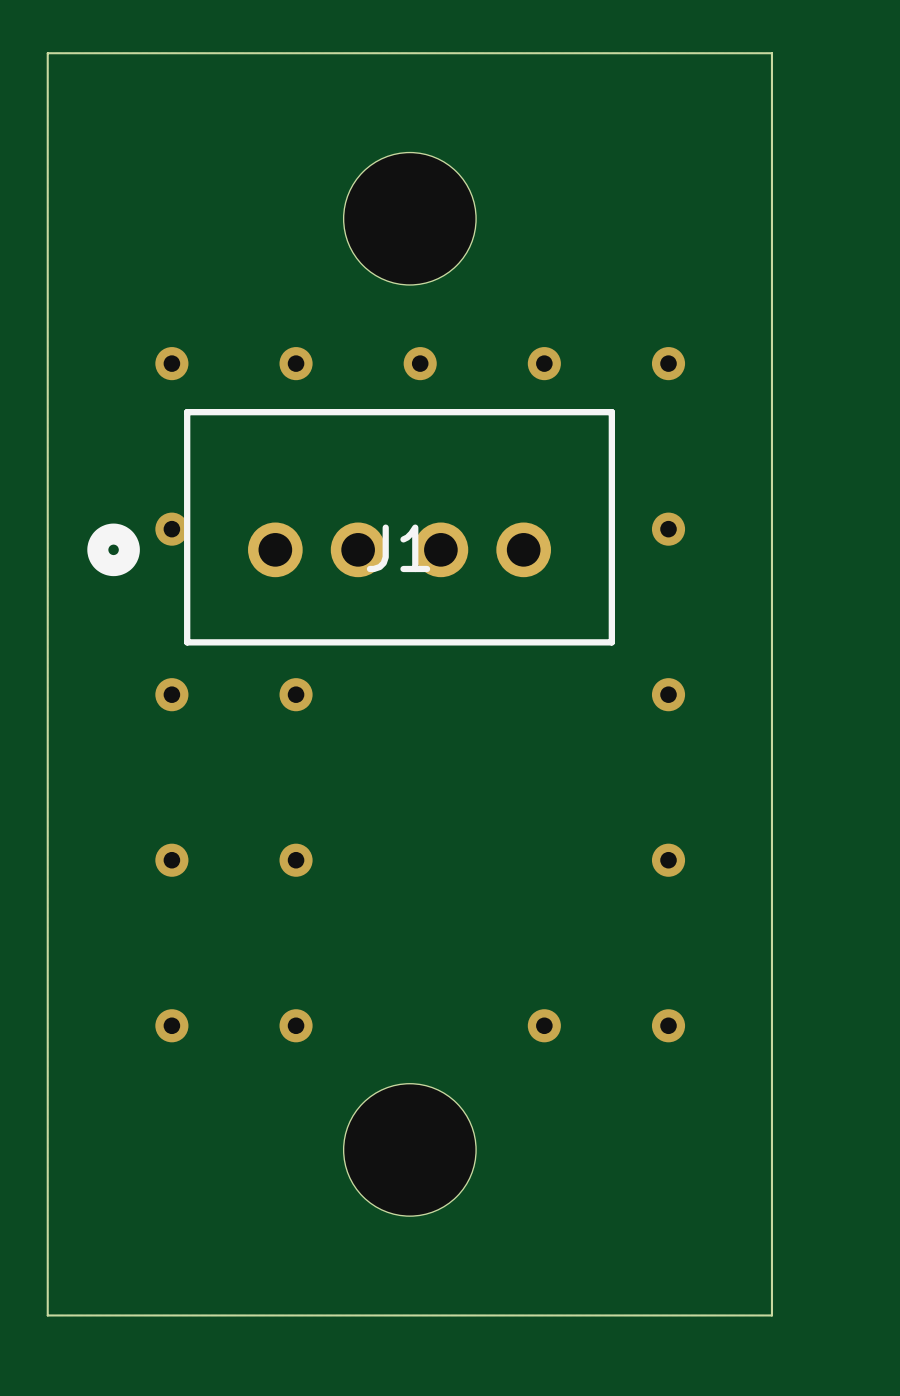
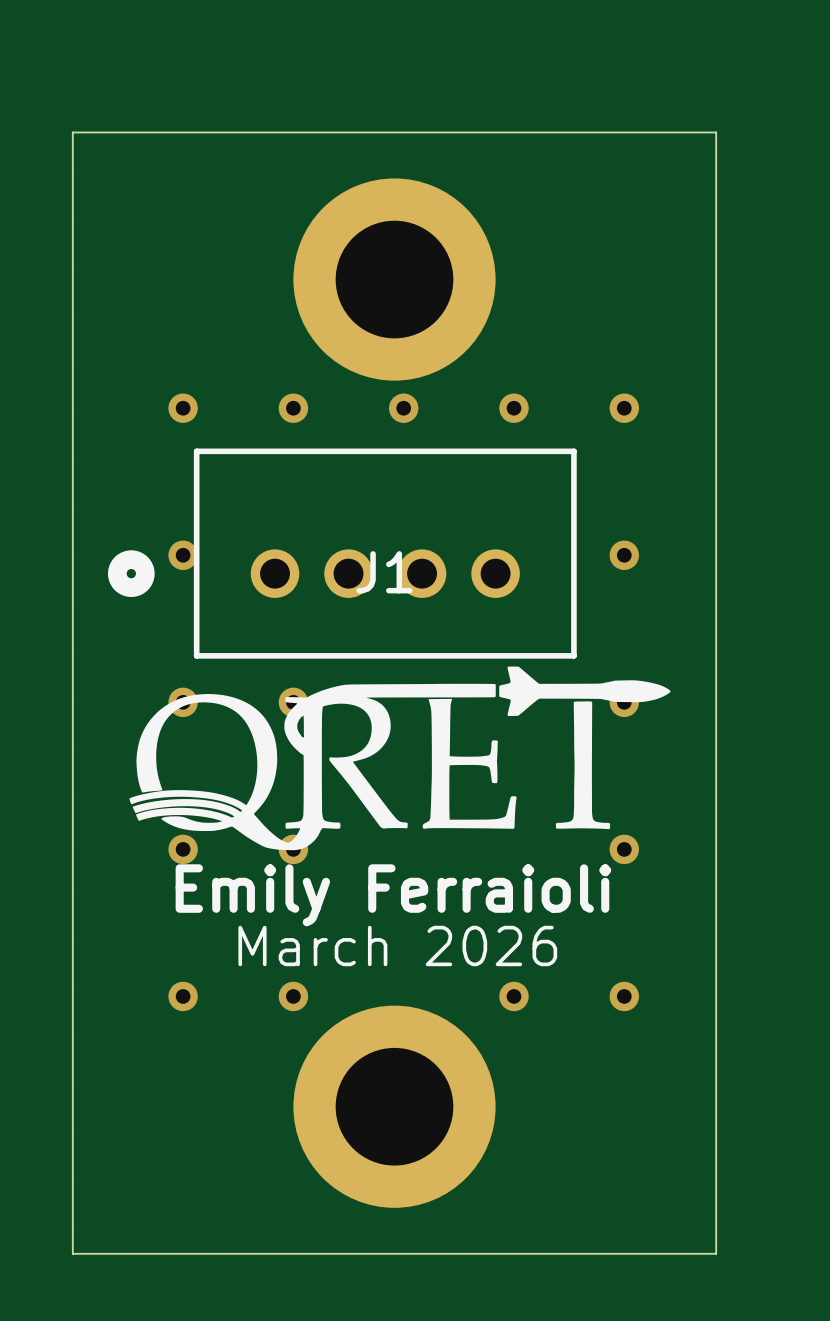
part footprint: [343, 152, 477, 285] -> [293, 178, 496, 381]
drawing: none -> [129, 666, 671, 851]
text: none -> Emily Ferraioli (393, 895)
text: none -> March 2026 (397, 945)
part footprint: [343, 1083, 477, 1217] -> [293, 1005, 496, 1208]

